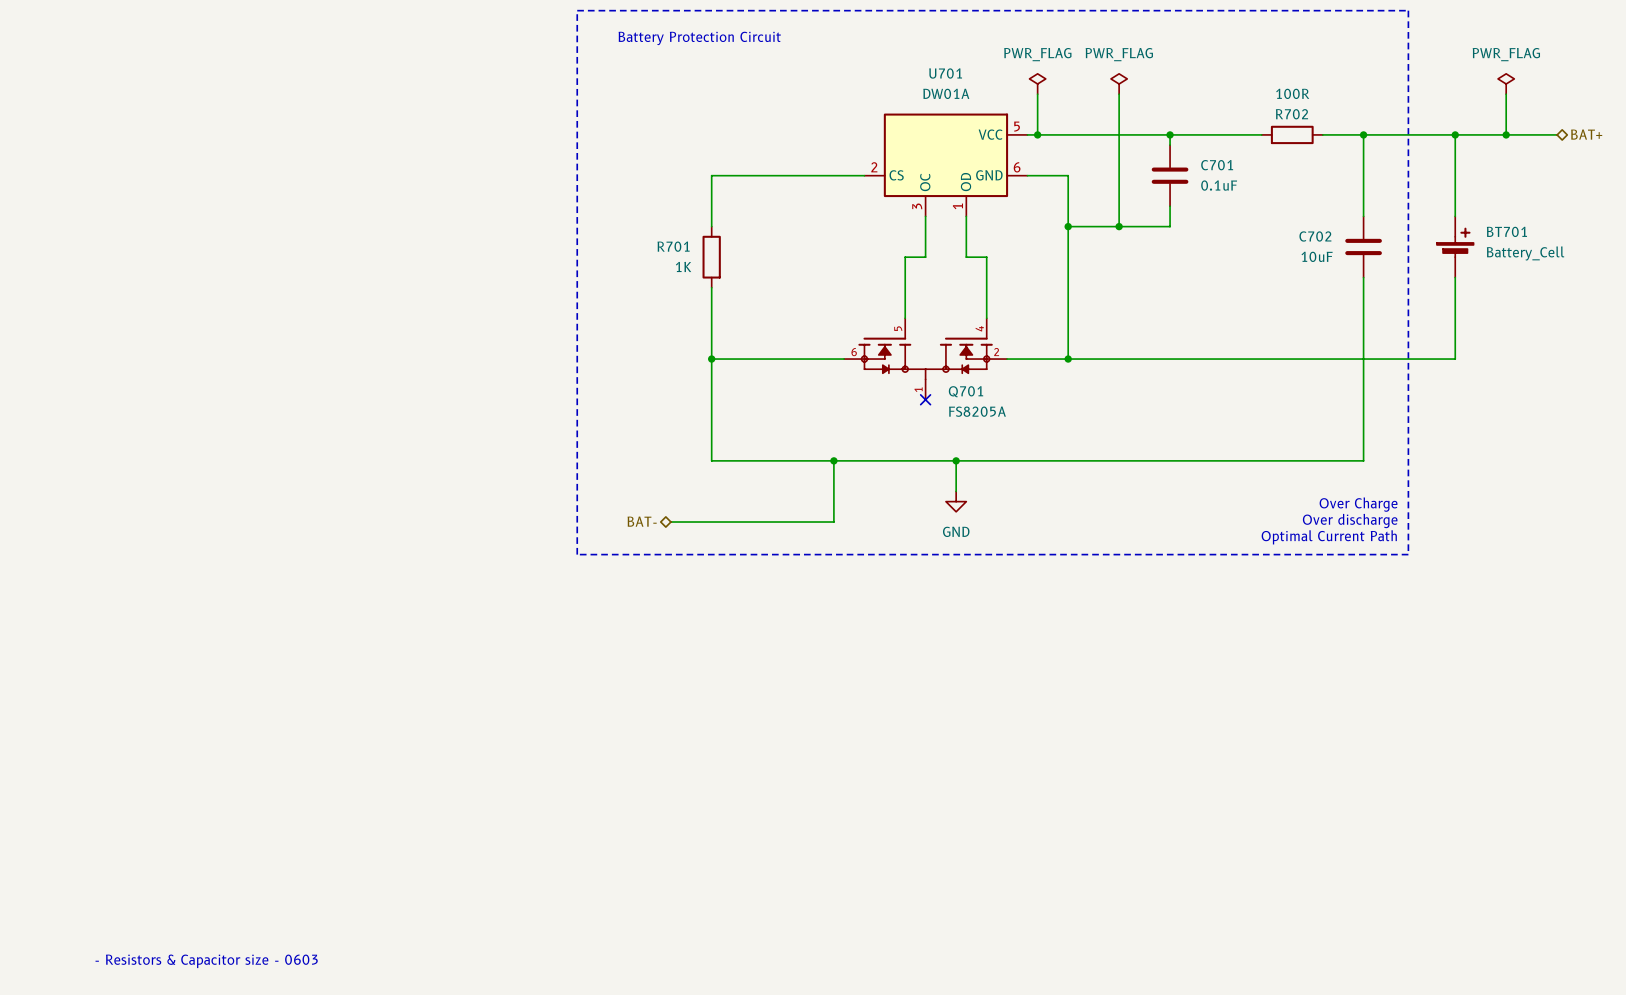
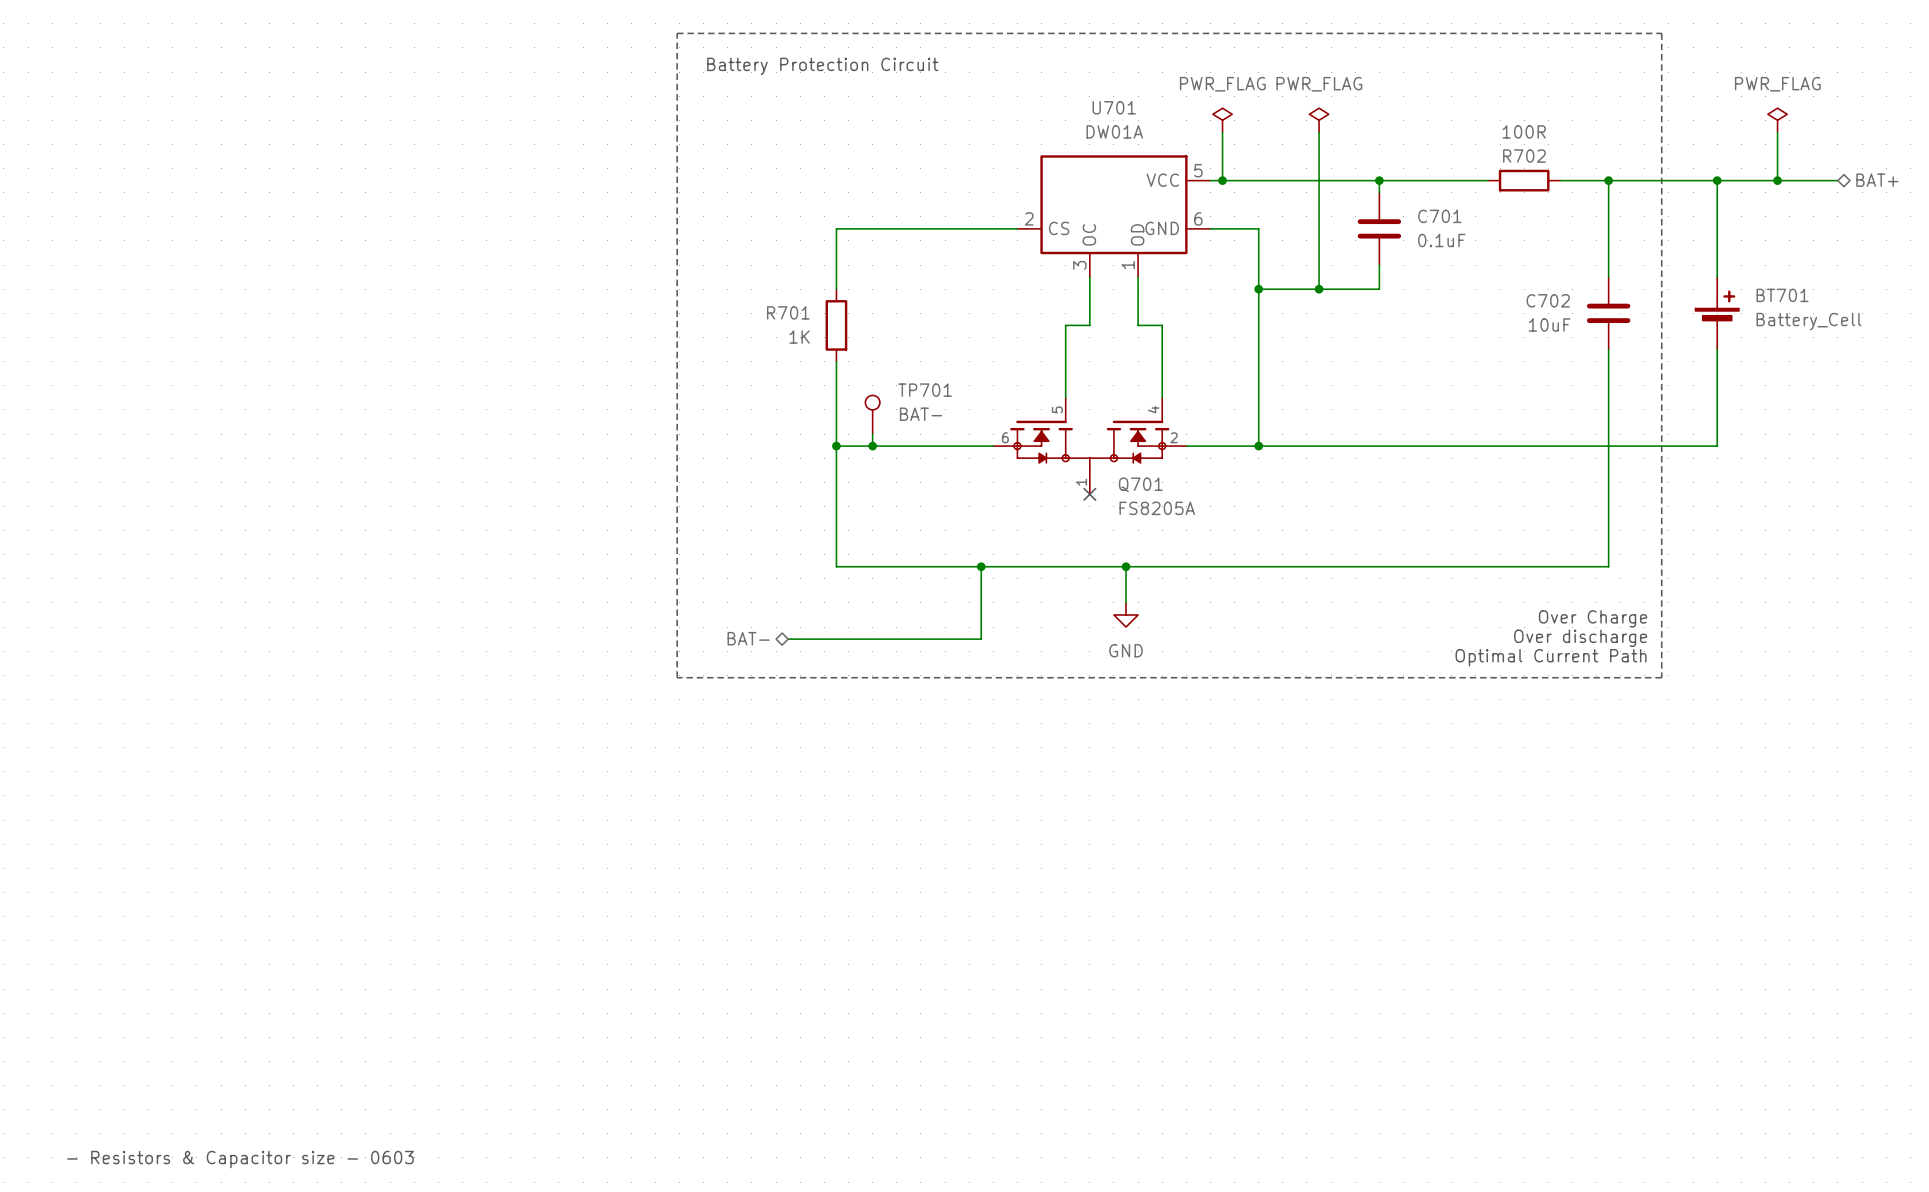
TP701: none -> BAT- (872, 414)
wire: none -> (872, 434) (872, 446)
junction: none -> (872, 446)

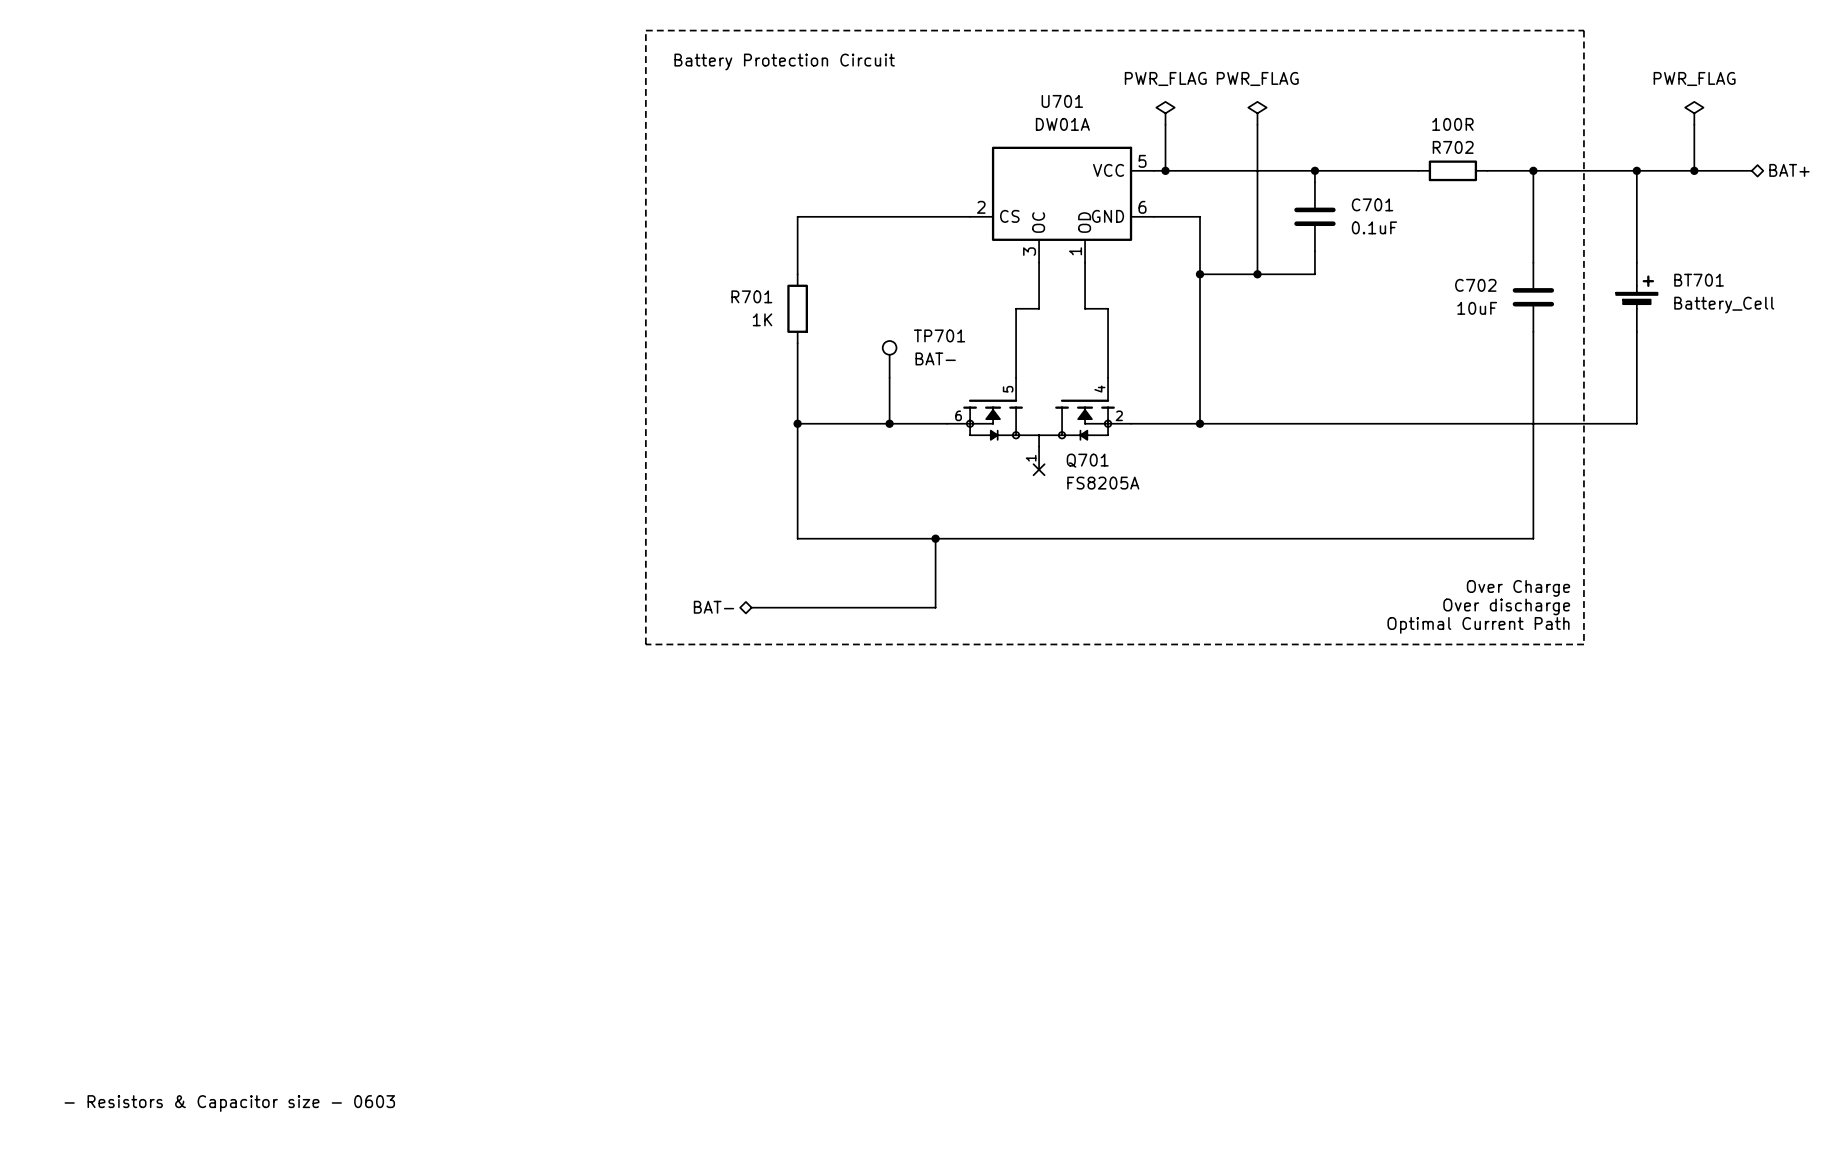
wire: none -> (889, 377) (889, 423)
TP701 position: (872, 414) -> (889, 359)
wire: (872, 434) (872, 446) -> none
junction: (872, 446) -> none
junction: none -> (889, 423)
wire: (1126, 566) (1126, 602) -> none
junction: (1126, 566) -> none
power symbol: GND (1126, 614) -> none

